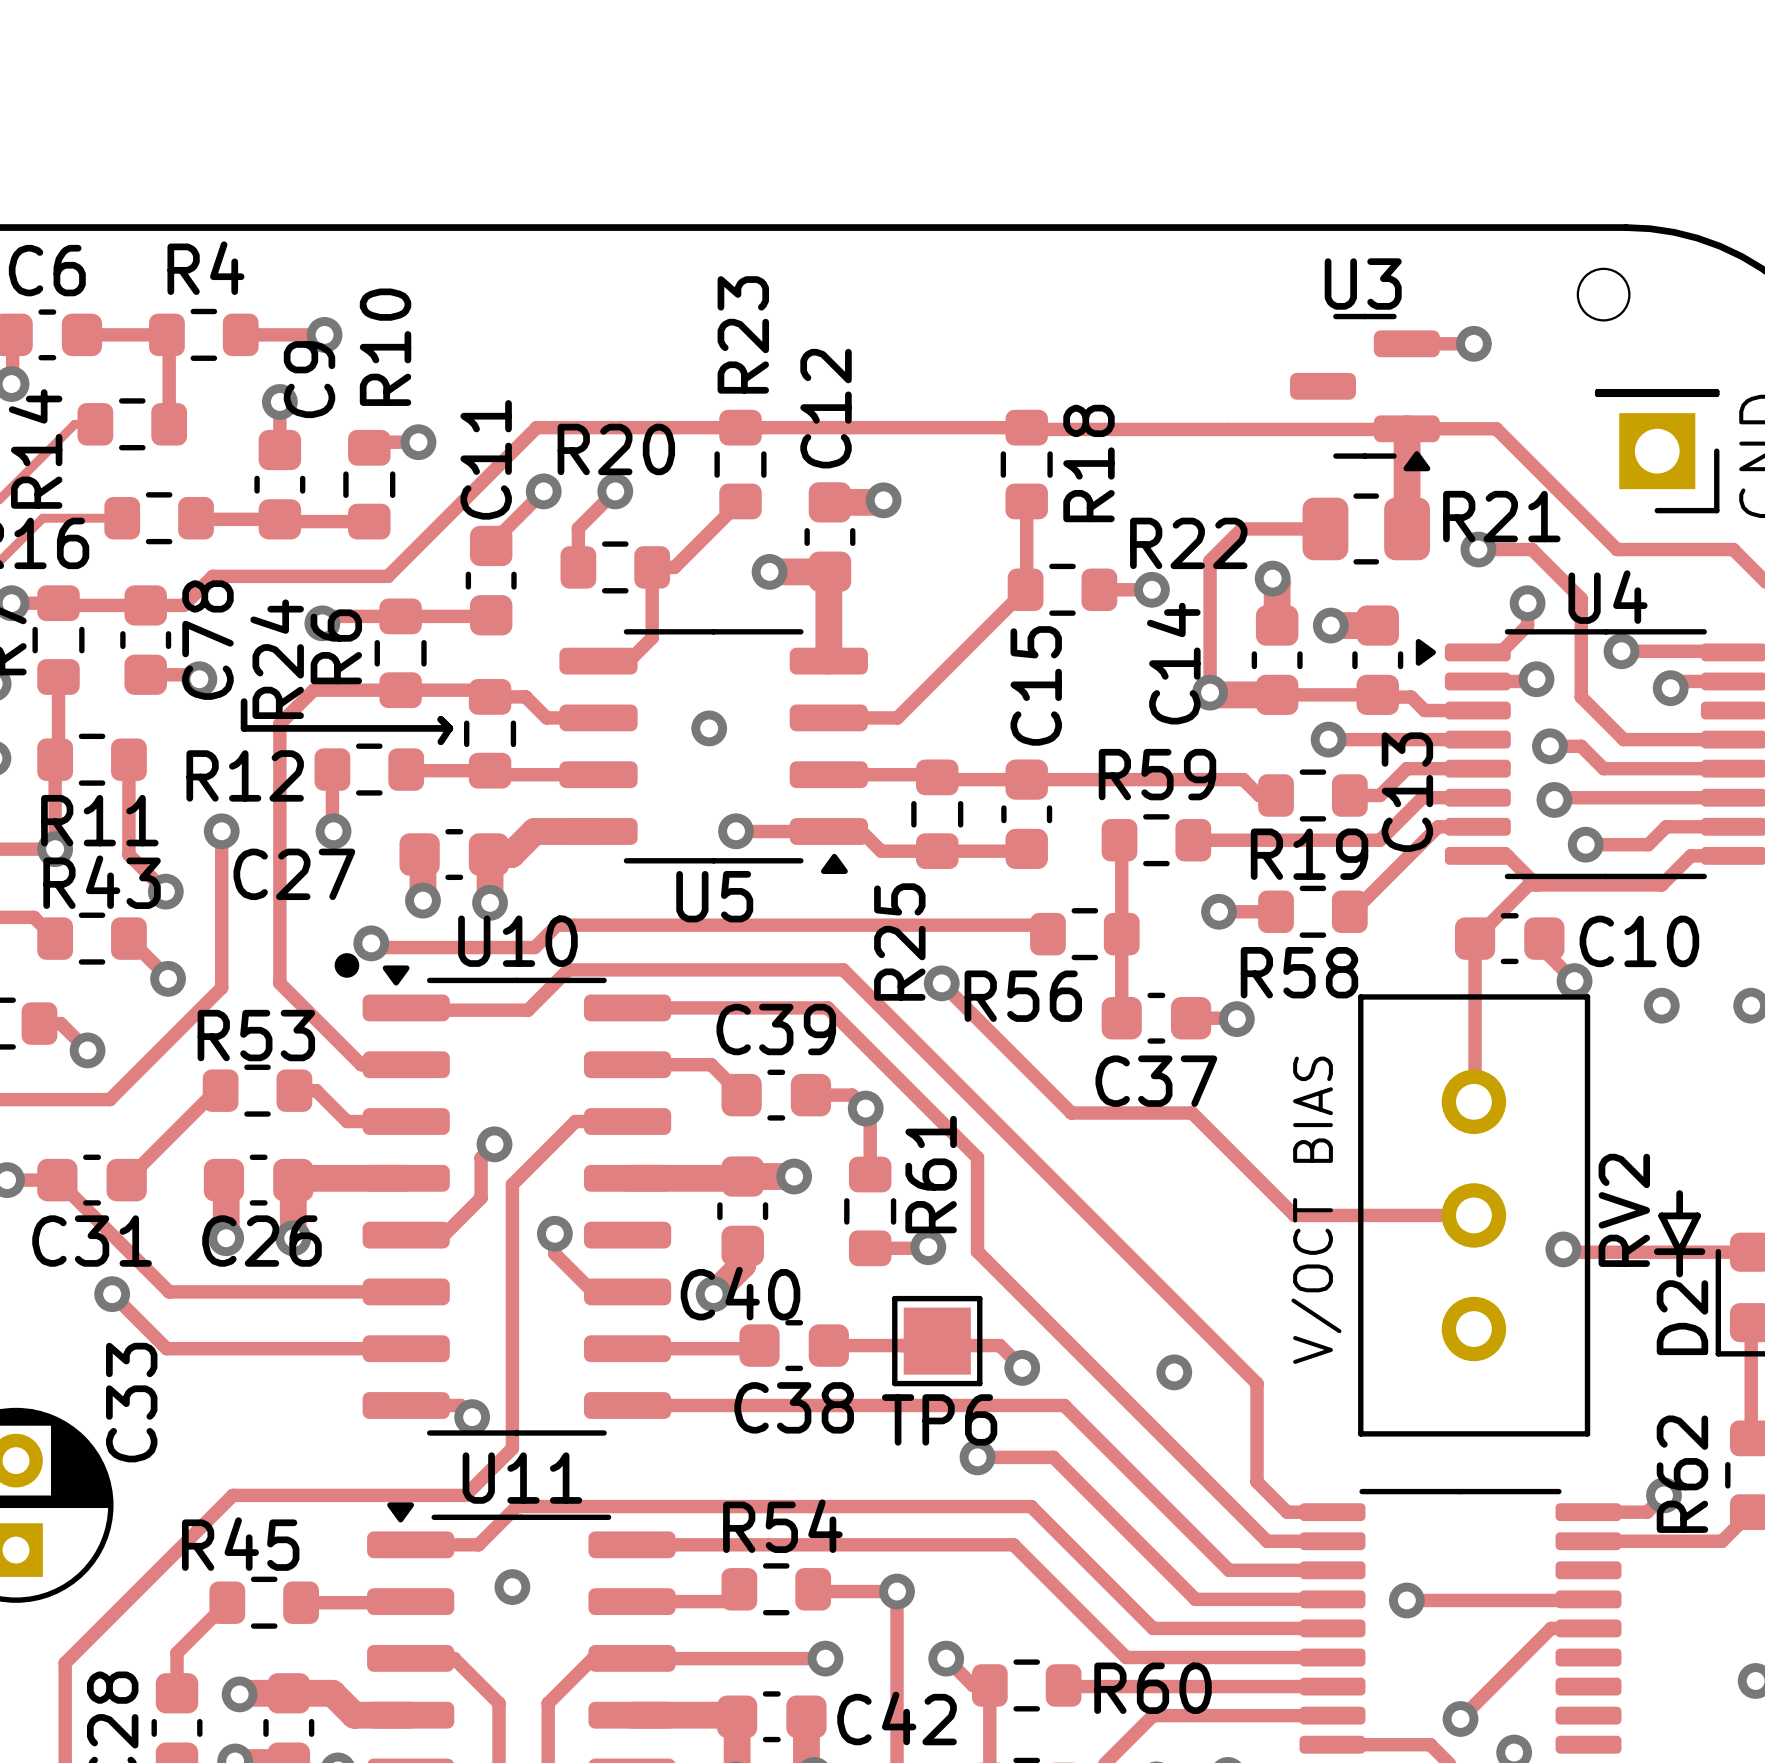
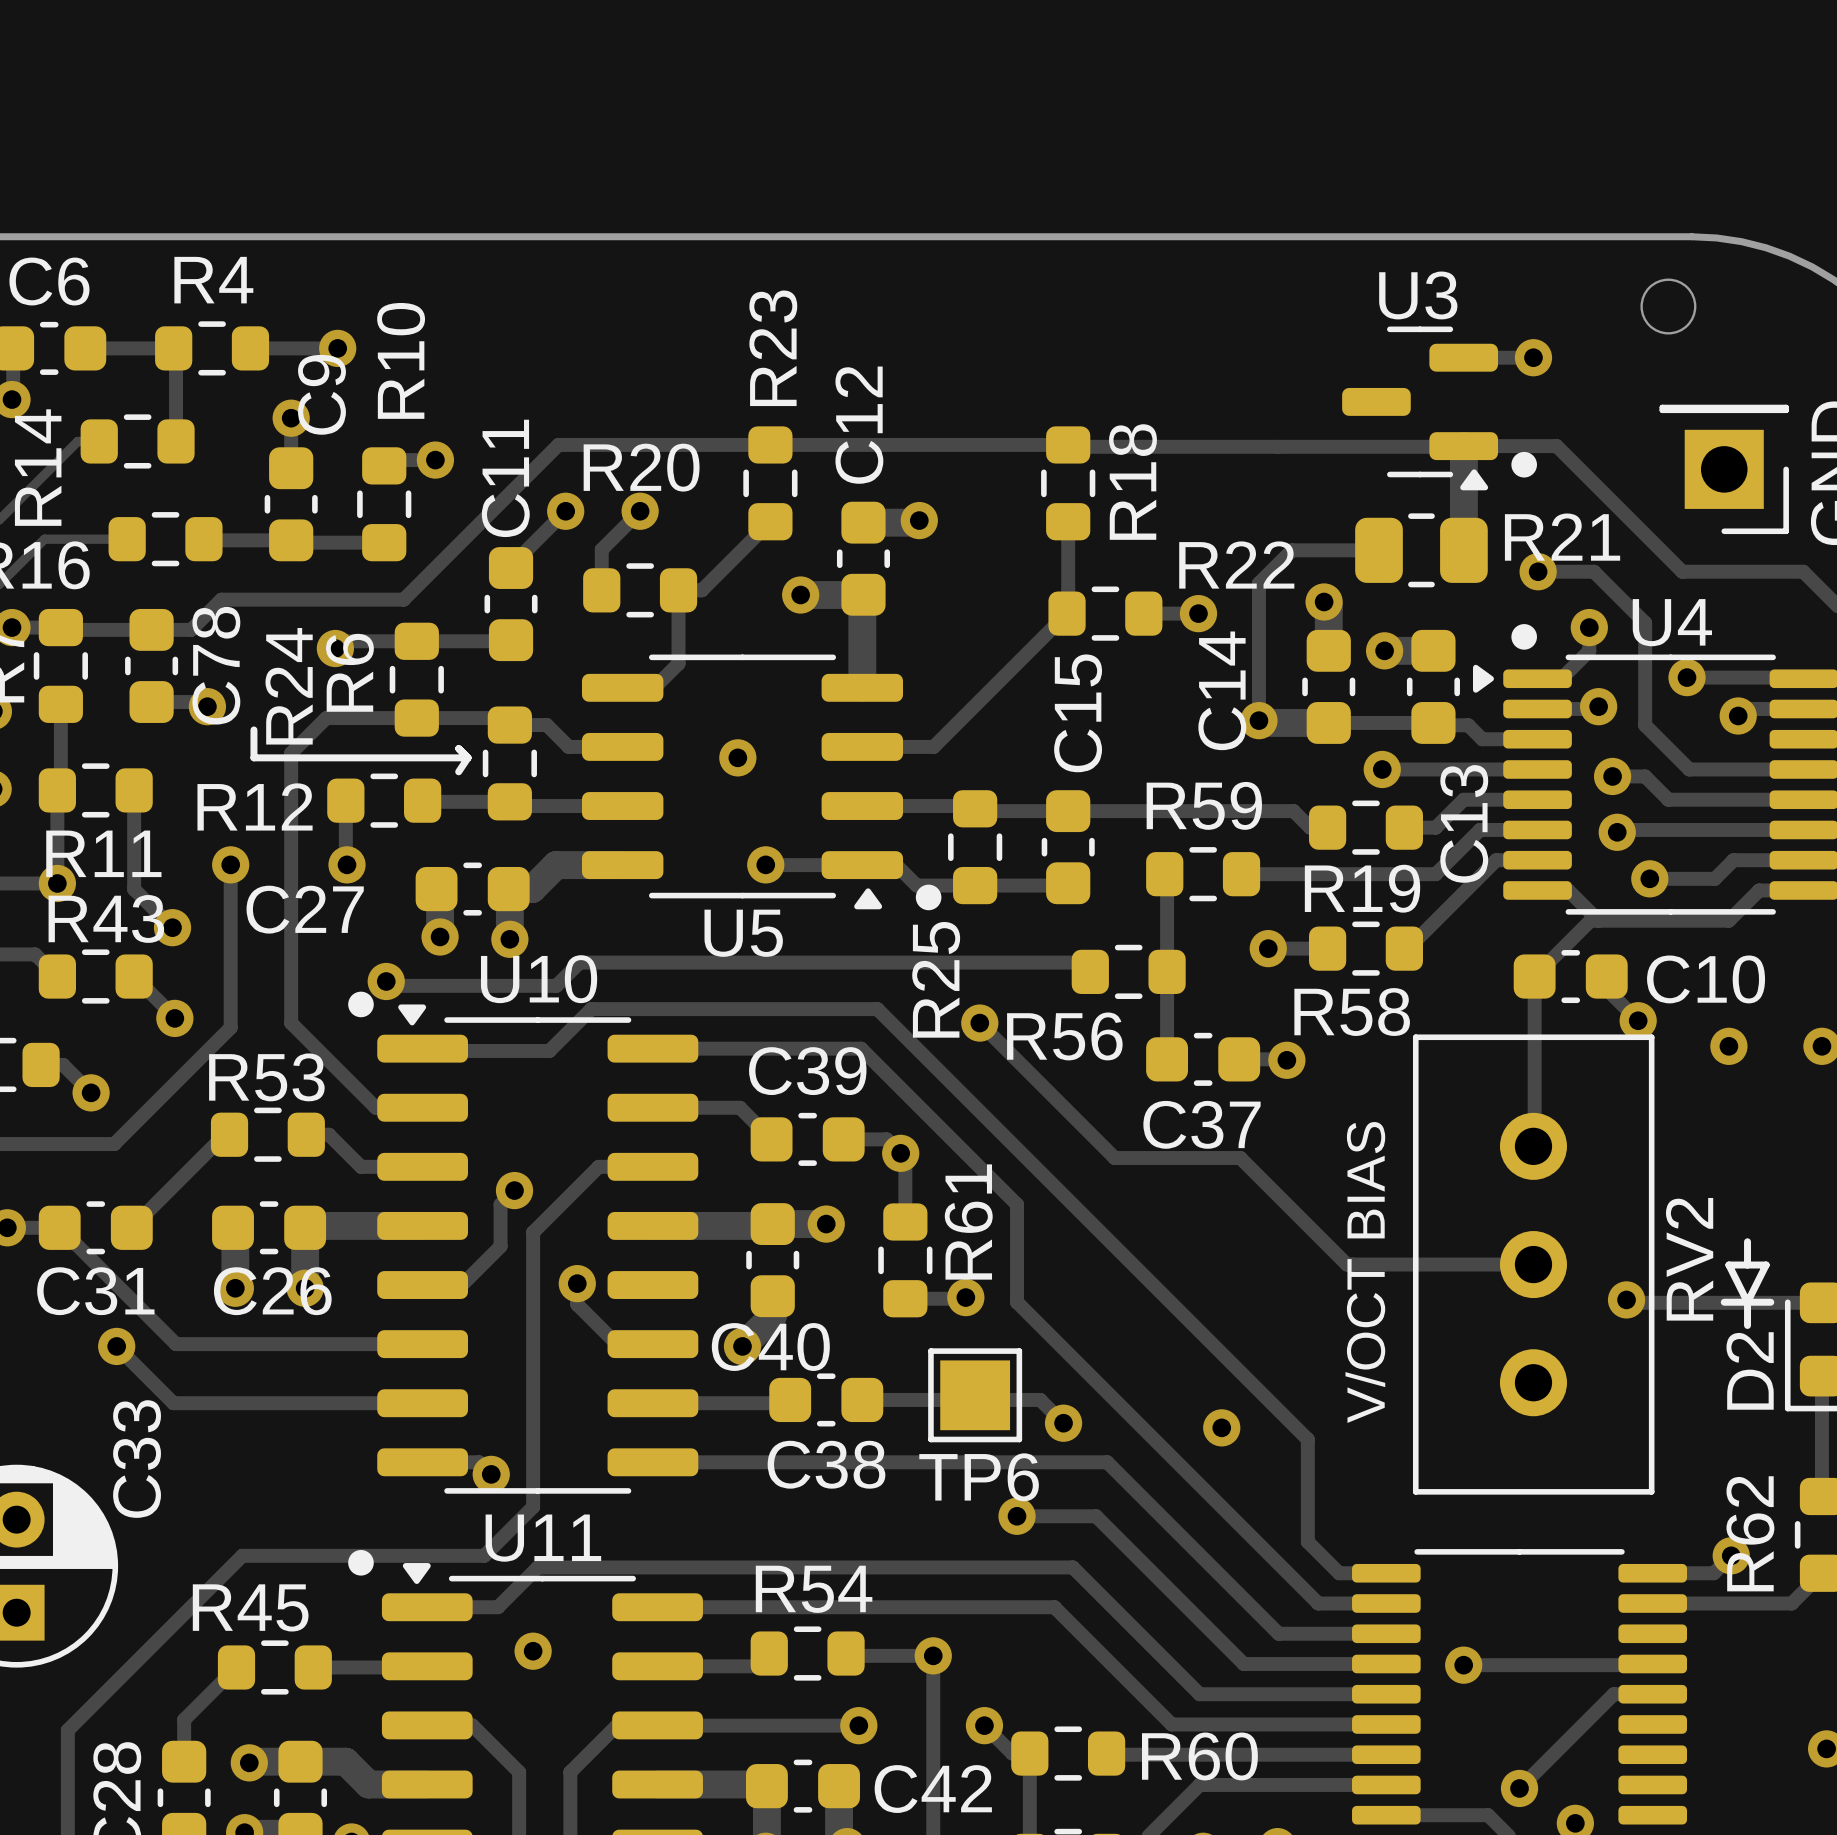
drawing: none -> [1511, 451, 1537, 478]
drawing: none -> [1511, 624, 1537, 650]
drawing: none -> [915, 884, 942, 911]
drawing: none -> [348, 1550, 374, 1576]

